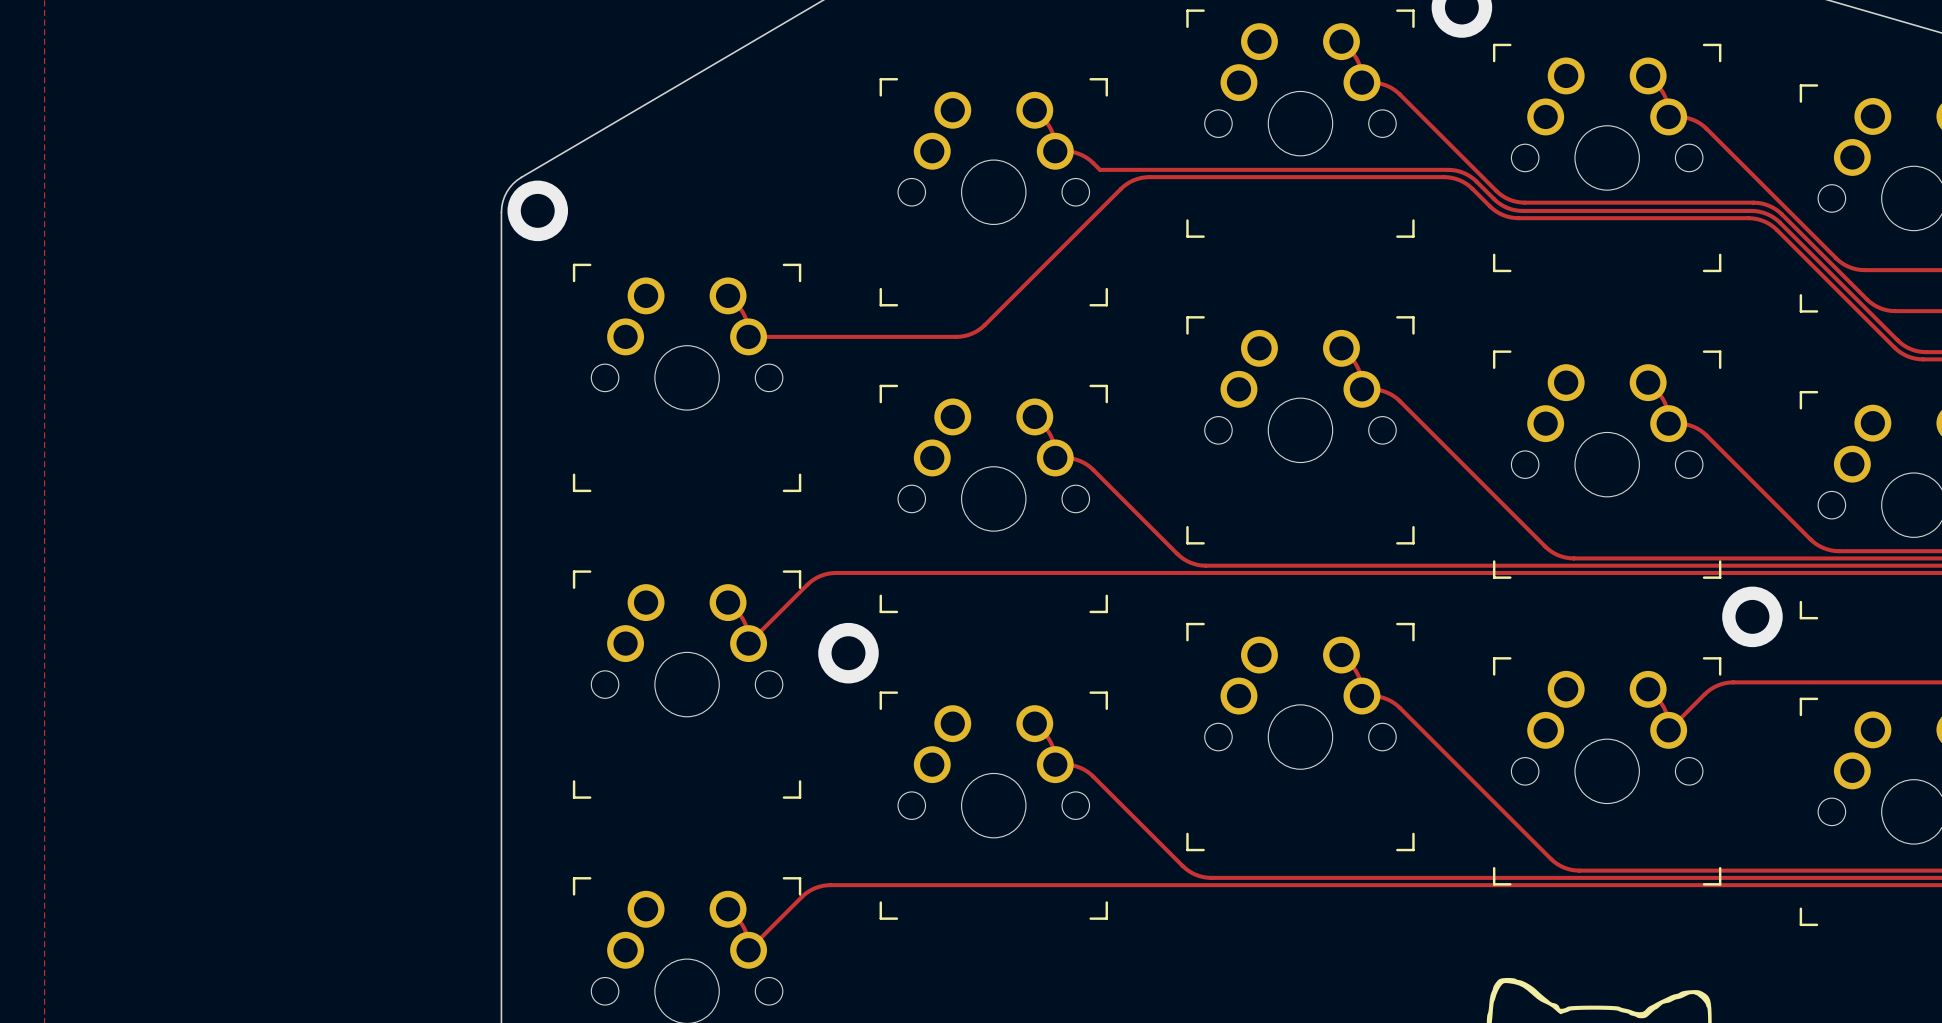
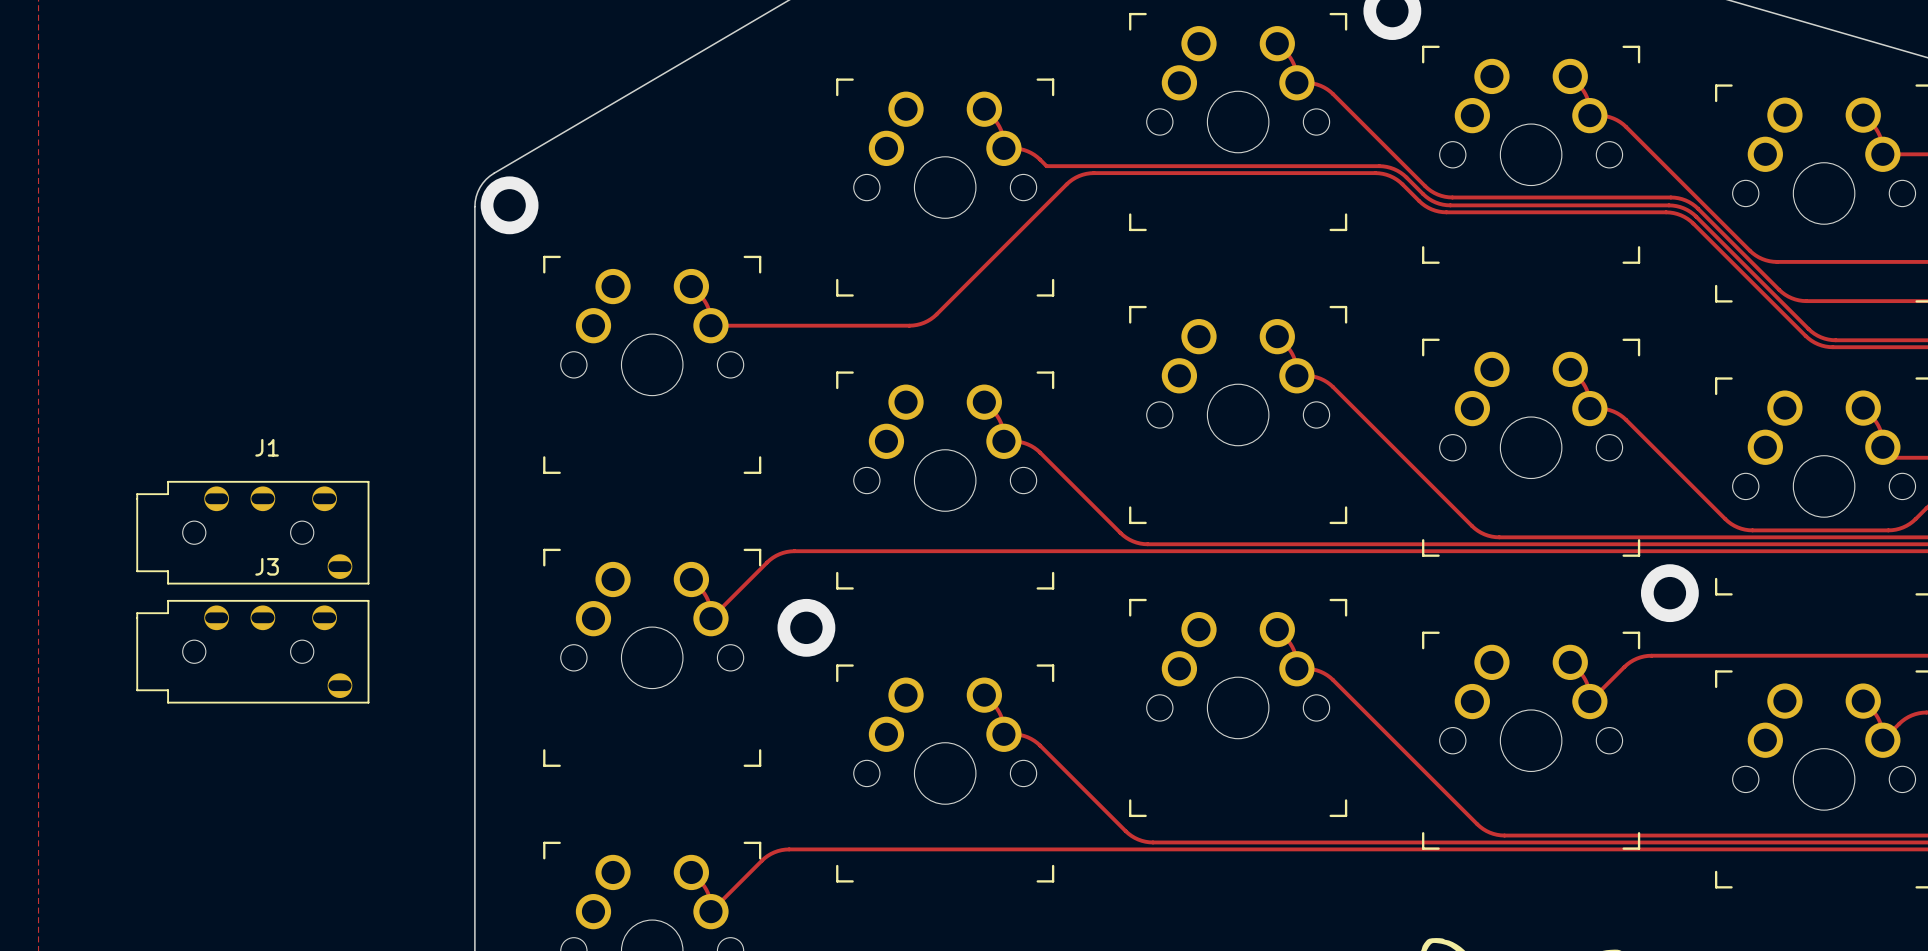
J1: none -> (252, 532)
J3: none -> (252, 651)

